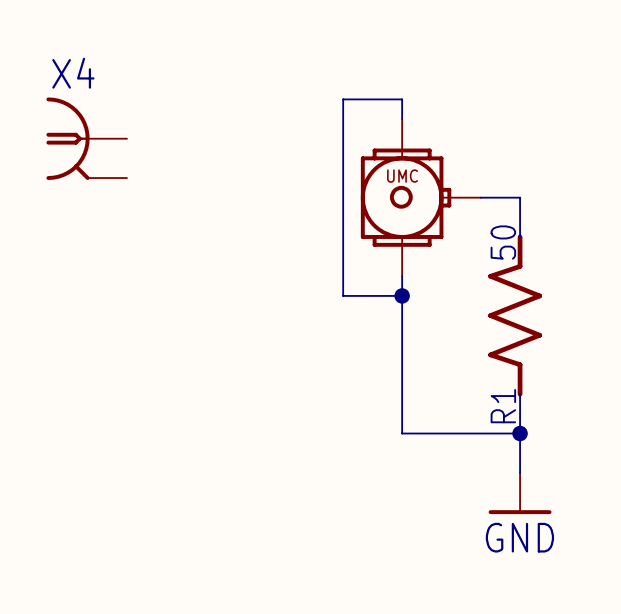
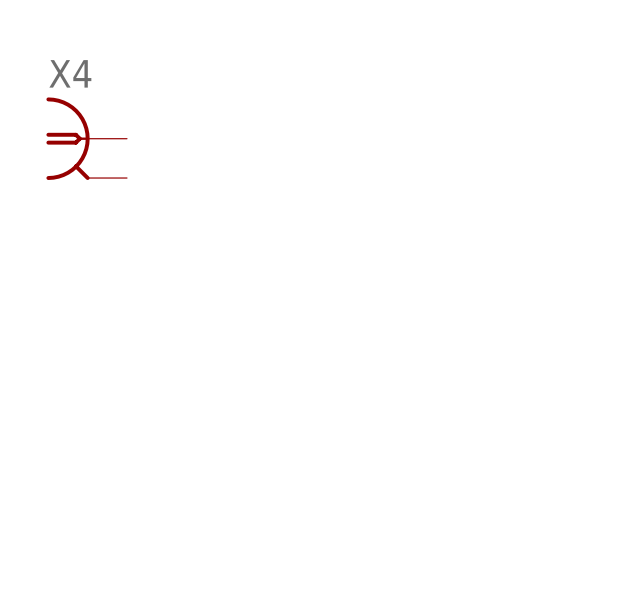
wire: (402, 119) (402, 99) (343, 99) (343, 295) (402, 295) -> none
part: (420, 197) -> none
wire: (480, 197) (520, 197) (520, 236) -> none
wire: (402, 276) (402, 433) (520, 433) -> none
junction: (402, 295) -> none
R1: 50 (515, 315) -> none
wire: (520, 394) (520, 472) -> none
junction: (520, 433) -> none
power symbol: GND (520, 493) -> none

